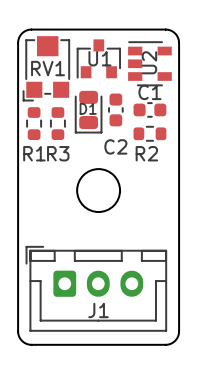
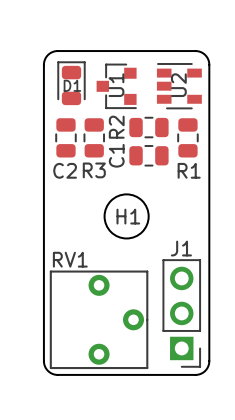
RV1 footprint: [22, 36, 70, 102] -> [49, 270, 149, 370]
U1 rotation: 0° (98, 58) -> 90° counterclockwise (116, 86)
RV1 name position: RV1 (48, 68) -> RV1 (70, 259)
C1 name position: C1 (149, 92) -> C1 (116, 155)
C2 footprint: [108, 93, 124, 127] -> [55, 118, 77, 158]
C1 footprint: [133, 102, 167, 118] -> [129, 145, 169, 167]
R1 footprint: [26, 107, 42, 141] -> [177, 118, 199, 158]
R3 footprint: [50, 107, 66, 141] -> [83, 118, 105, 158]
D1 rotation: 0° (88, 112) -> 180° (71, 83)
D1 position: (88, 112) -> (71, 83)
R2 footprint: [133, 125, 167, 142] -> [129, 116, 169, 139]
R2 name position: R2 (146, 153) -> R2 (116, 127)
H1 name: none -> H1 (128, 216)
J1 footprint: [25, 246, 167, 332] -> [162, 259, 201, 368]
J1 name position: J1 (98, 310) -> J1 (181, 248)

